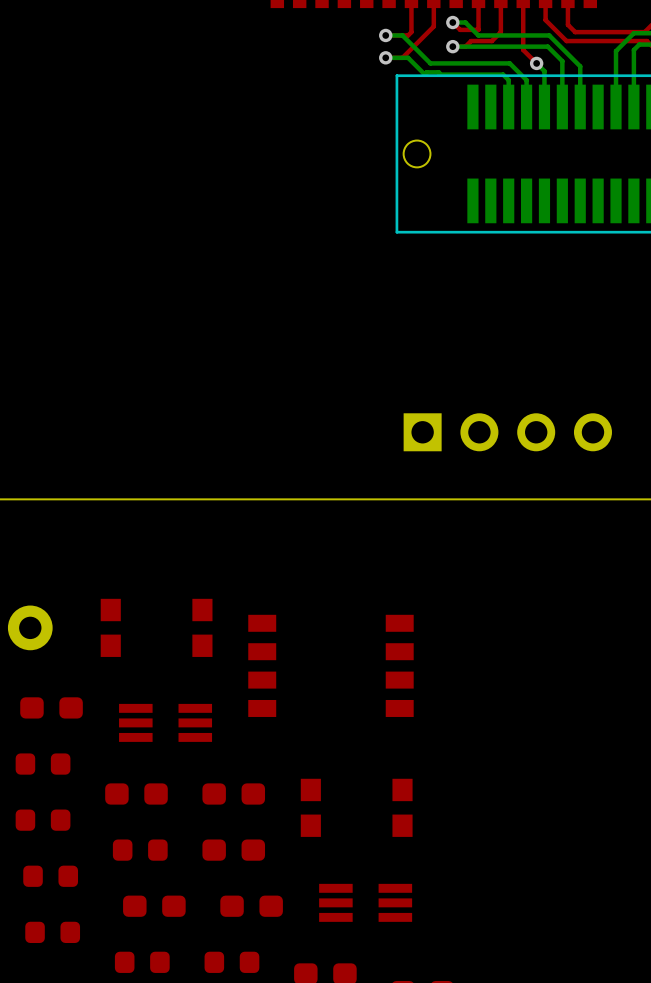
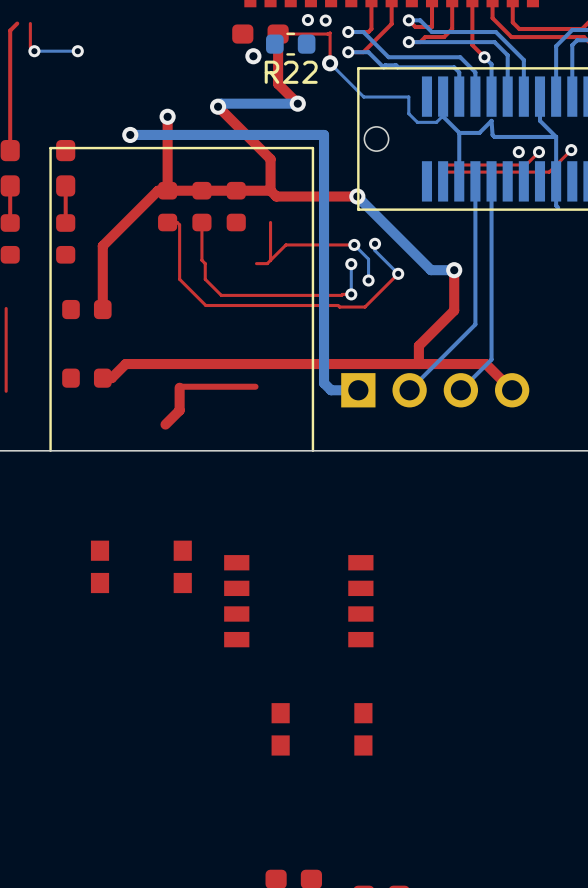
via: none -> (307, 20)
via: none -> (325, 20)
top track: none -> (17, 23) (10, 30) (10, 150)
top track: none -> (30, 23) (30, 47) (34, 51)
part: none -> (260, 34)
R22: none -> (290, 44)
via: none -> (34, 51)
bottom track: none -> (77, 51) (34, 51)
via: none -> (77, 51)
via: none -> (253, 56)
top track: none -> (330, 63) (330, 33) (278, 34) (278, 83) (297, 103)
bottom track: none -> (330, 63) (363, 97) (408, 97) (408, 113) (417, 122) (436, 122) (443, 115) (443, 96) (443, 116) (459, 132) (459, 181)
via: none -> (330, 63)
bottom track: none -> (539, 96) (539, 120) (556, 136)
bottom track: none -> (297, 103) (221, 103) (218, 106)
via: none -> (297, 103)
top track: none -> (218, 106) (270, 159) (270, 190)
via: none -> (218, 106)
top track: none -> (167, 116) (167, 190)
via: none -> (167, 116)
bottom track: none -> (459, 132) (479, 132) (491, 120) (492, 134) (494, 136) (556, 136)
bottom track: none -> (130, 134) (324, 134) (324, 383) (331, 390) (358, 390)
via: none -> (130, 134)
bottom track: none -> (556, 136) (556, 205) (558, 207)
top track: none -> (571, 150) (549, 172) (445, 172)
via: none -> (571, 150)
via: none -> (518, 152)
top track: none -> (538, 152) (526, 164) (442, 164)
via: none -> (538, 152)
part: none -> (10, 168)
part: none -> (65, 168)
bottom track: none -> (475, 181) (475, 324) (409, 390)
bottom track: none -> (491, 181) (491, 359) (460, 390)
top track: none -> (10, 185) (10, 223)
top track: none -> (65, 185) (65, 223)
top track: none -> (270, 190) (158, 190) (102, 245) (102, 309)
top track: none -> (270, 190) (276, 196) (357, 196)
bottom track: none -> (357, 196) (431, 270) (454, 270)
via: none -> (357, 196)
part: none -> (167, 206)
part: none -> (201, 206)
part: none -> (236, 206)
top track: none -> (167, 222) (177, 222) (179, 224) (179, 279) (205, 305) (365, 307) (398, 273)
top track: none -> (201, 222) (201, 260) (205, 263) (205, 279) (221, 295) (351, 294)
top track: none -> (270, 222) (270, 260)
part: none -> (10, 238)
part: none -> (65, 238)
bottom track: none -> (375, 243) (375, 250) (398, 273)
via: none -> (375, 243)
top track: none -> (354, 244) (285, 244) (267, 263) (256, 263)
bottom track: none -> (354, 244) (368, 259) (368, 280)
via: none -> (354, 244)
bottom track: none -> (351, 264) (351, 294)
via: none -> (351, 264)
top track: none -> (454, 270) (454, 310) (418, 345) (418, 364)
via: none -> (454, 270)
via: none -> (398, 273)
via: none -> (368, 280)
via: none -> (351, 294)
top track: none -> (6, 308) (6, 391)
part: none -> (86, 309)
part: none -> (86, 378)
top track: none -> (102, 378) (111, 378) (125, 364) (485, 364) (512, 390)
top track: none -> (255, 386) (178, 386)
top track: none -> (179, 387) (179, 410) (165, 424)
part position: (507, 432) -> (435, 390)
line: none -> (312, 450) (312, 148) (50, 148) (50, 450)
part: (30, 627) -> none
part: (51, 707) -> none
part: (165, 722) -> none
part: (43, 764) -> none
part: (136, 793) -> none
part: (233, 793) -> none
part: (43, 820) -> none
part: (140, 850) -> none
part: (233, 850) -> none
part: (50, 876) -> none
part: (365, 902) -> none
part: (154, 906) -> none
part: (251, 906) -> none
part: (52, 932) -> none
part: (142, 962) -> none
part: (231, 962) -> none

